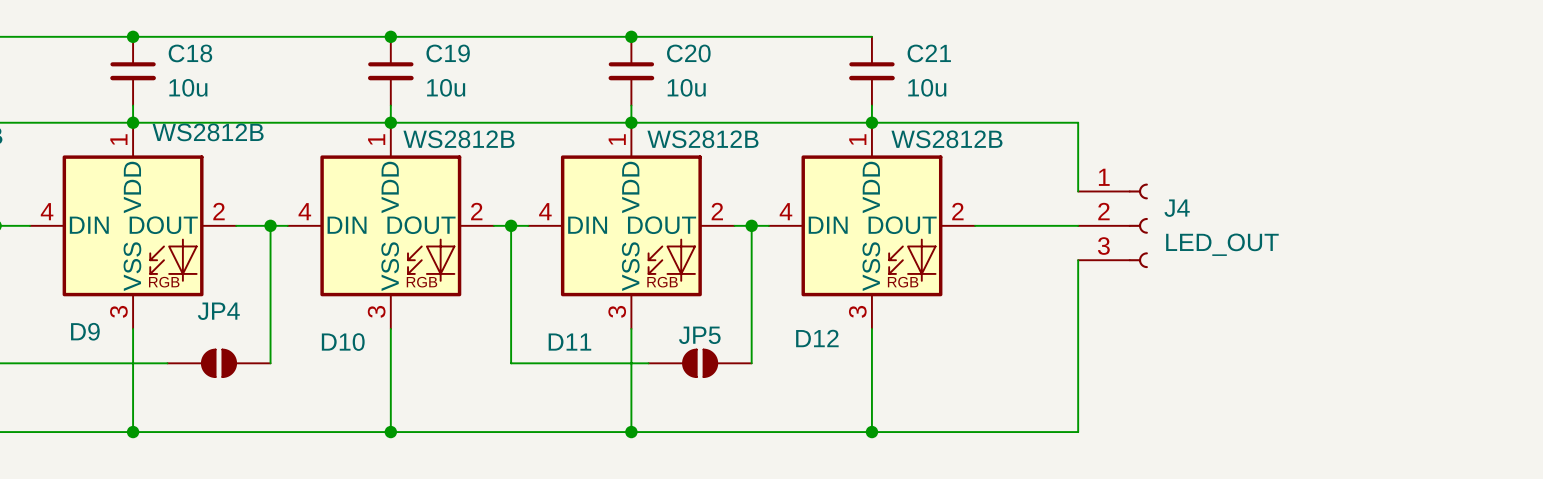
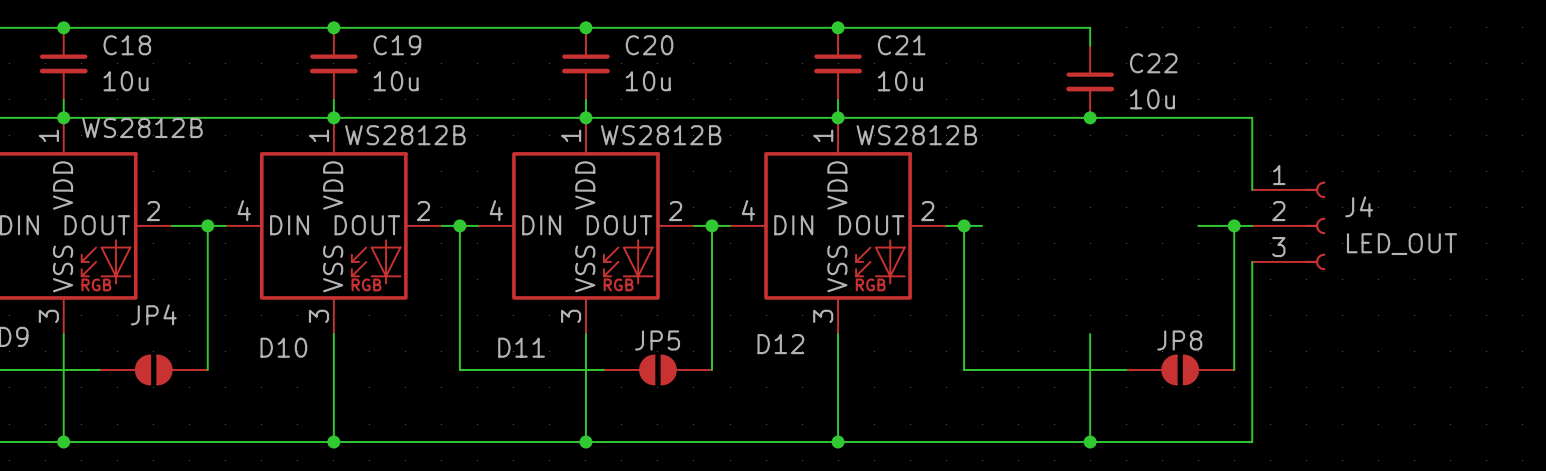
wire: none -> (838, 27) (1090, 27) (1090, 45)
junction: none -> (838, 27)
C22: none -> 10u (1090, 81)
wire: (1078, 122) (1078, 191) -> (1054, 117) (1252, 117) (1252, 189)
junction: none -> (1090, 117)
wire: none -> (964, 225) (964, 369) (1126, 369)
junction: none -> (964, 225)
wire: (1009, 225) (1078, 225) -> none
J4 position: (1113, 225) -> (1288, 225)
wire: none -> (1198, 225) (1252, 225)
wire: none -> (1234, 225) (1234, 369)
junction: none -> (1234, 225)
wire: (1078, 260) (1078, 432) -> (1252, 261) (1252, 442) (1054, 442)
wire: none -> (1090, 333) (1090, 442)
JP8: none -> (1180, 369)
junction: none -> (1090, 442)

